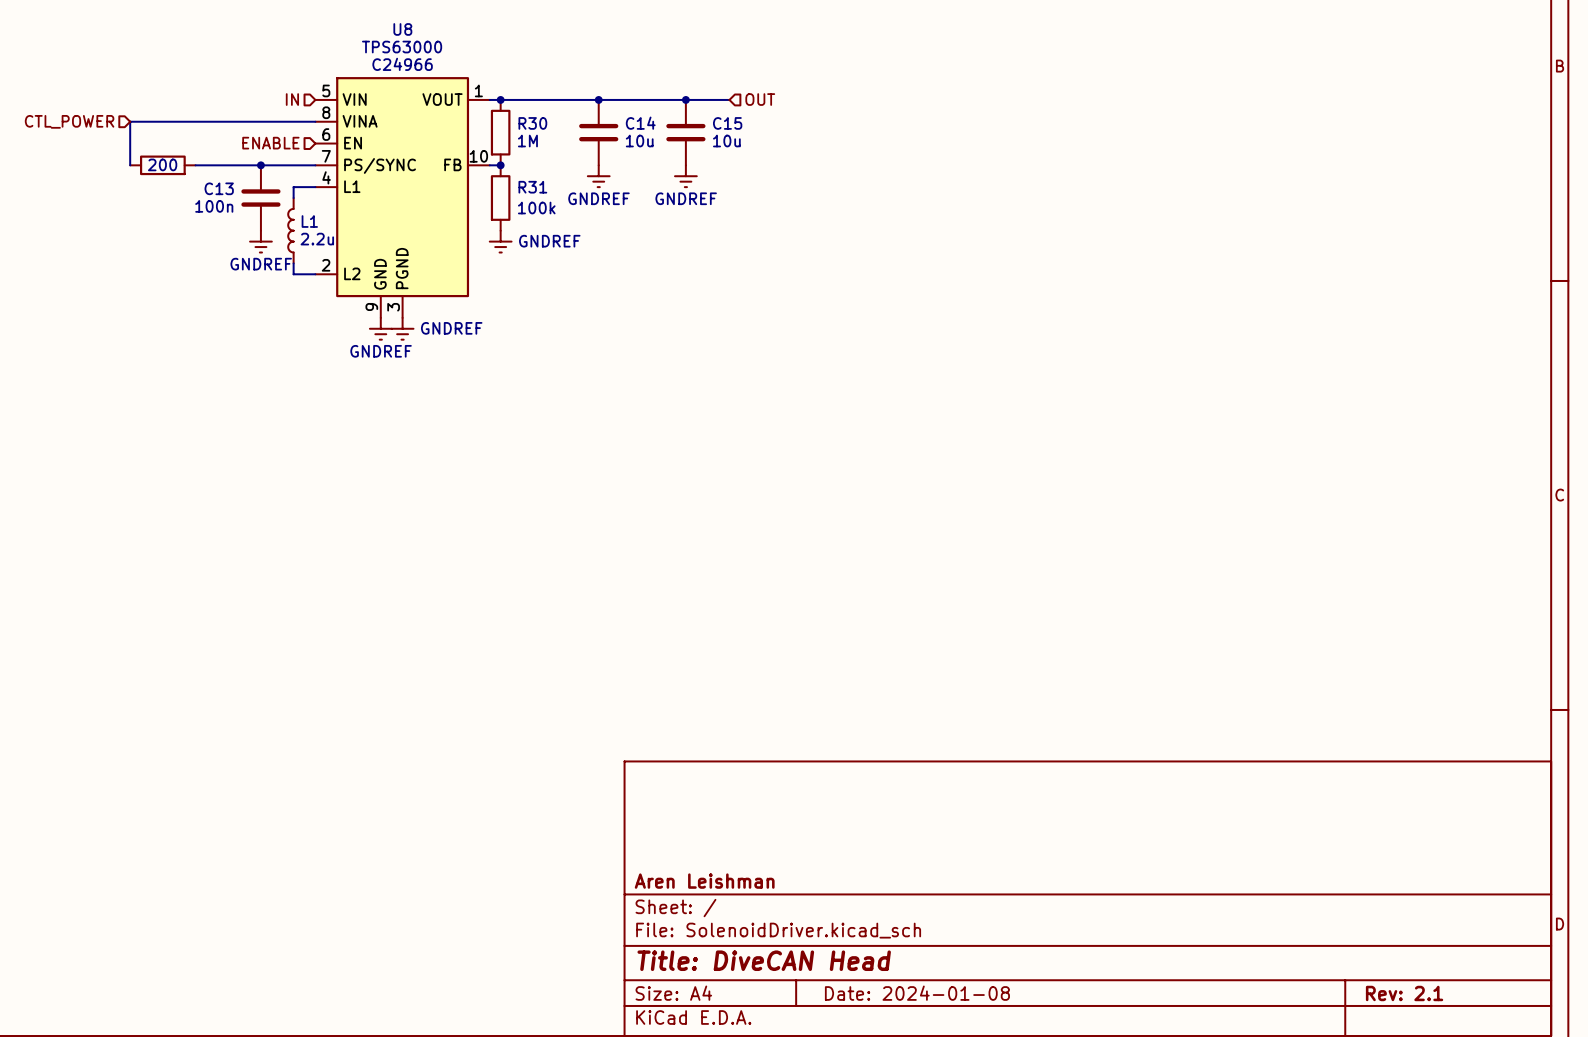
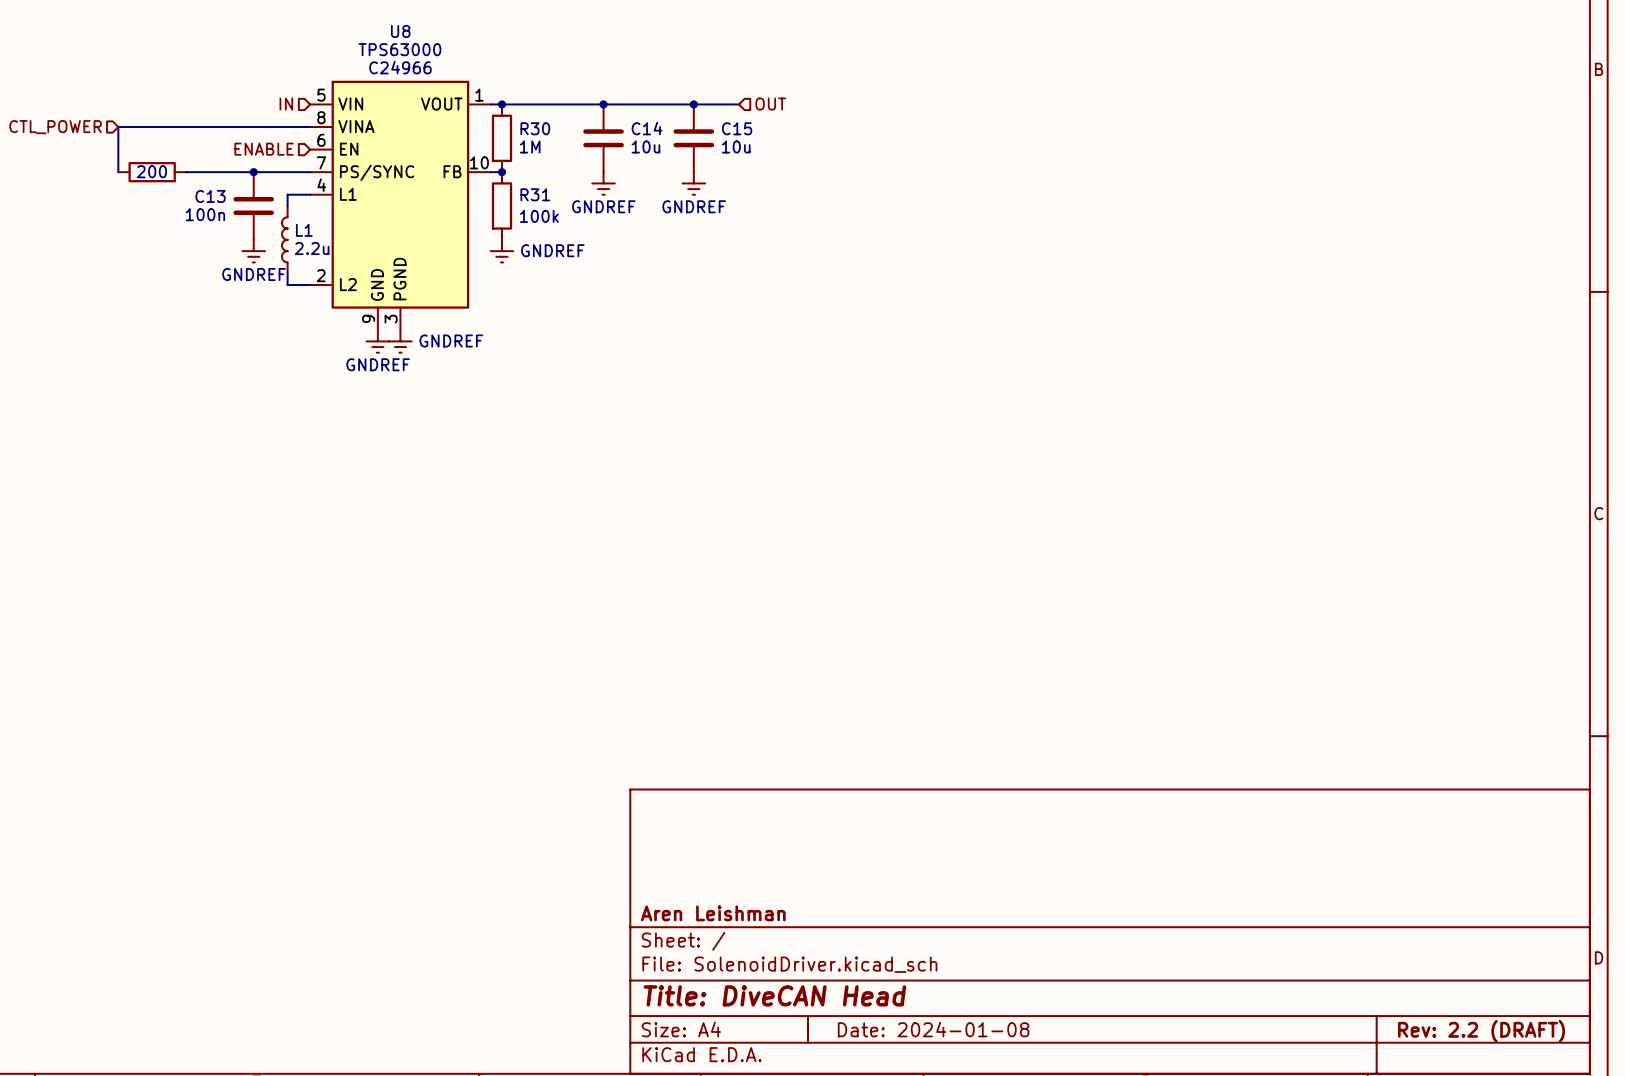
title block: Rev: 2.1 (1404, 993) -> Rev: 2.2 (DRAFT) (1481, 1031)

